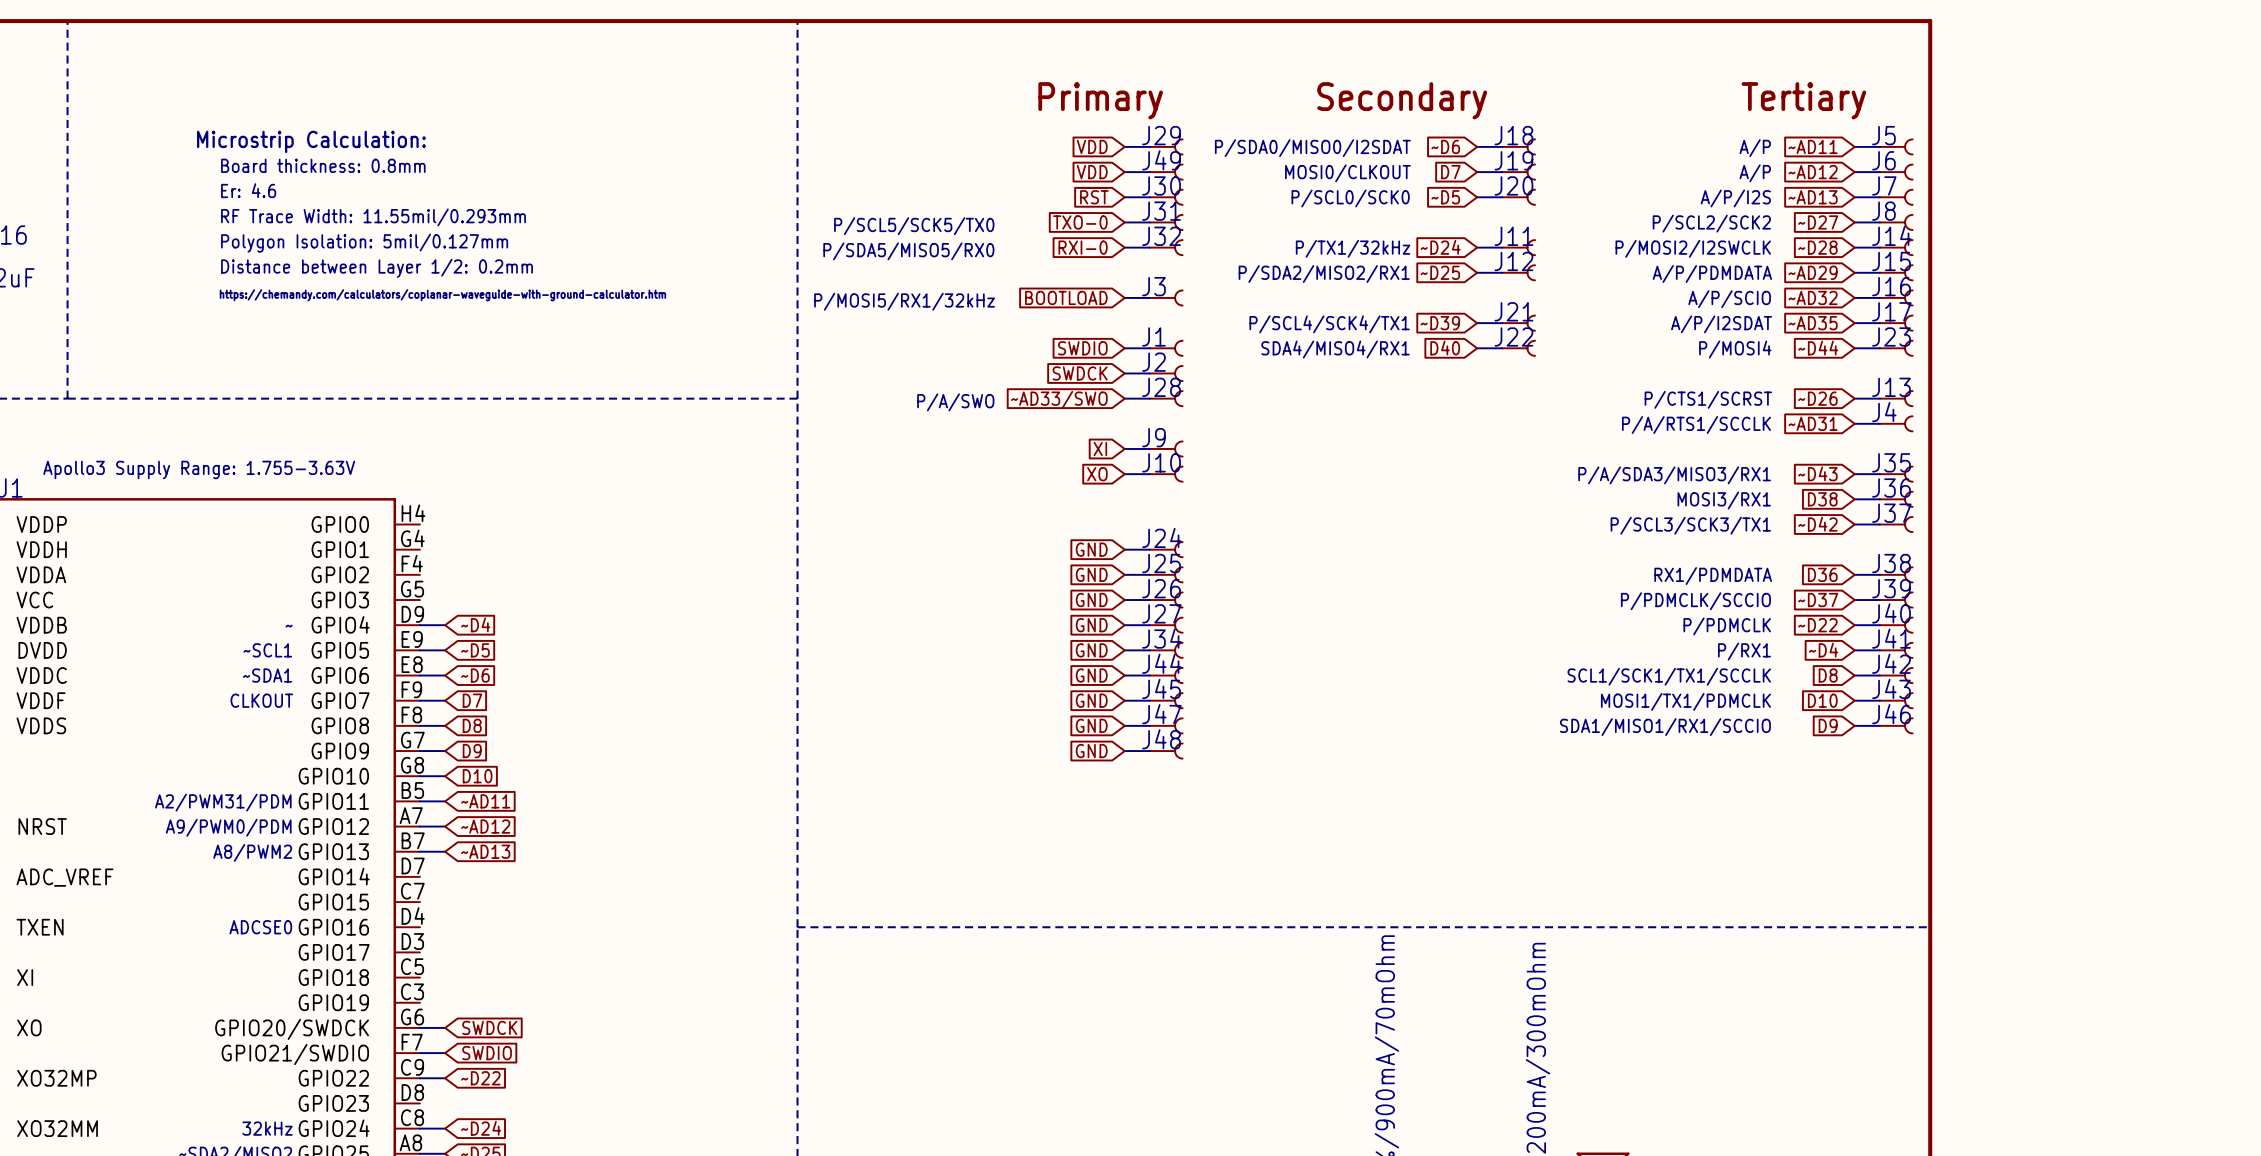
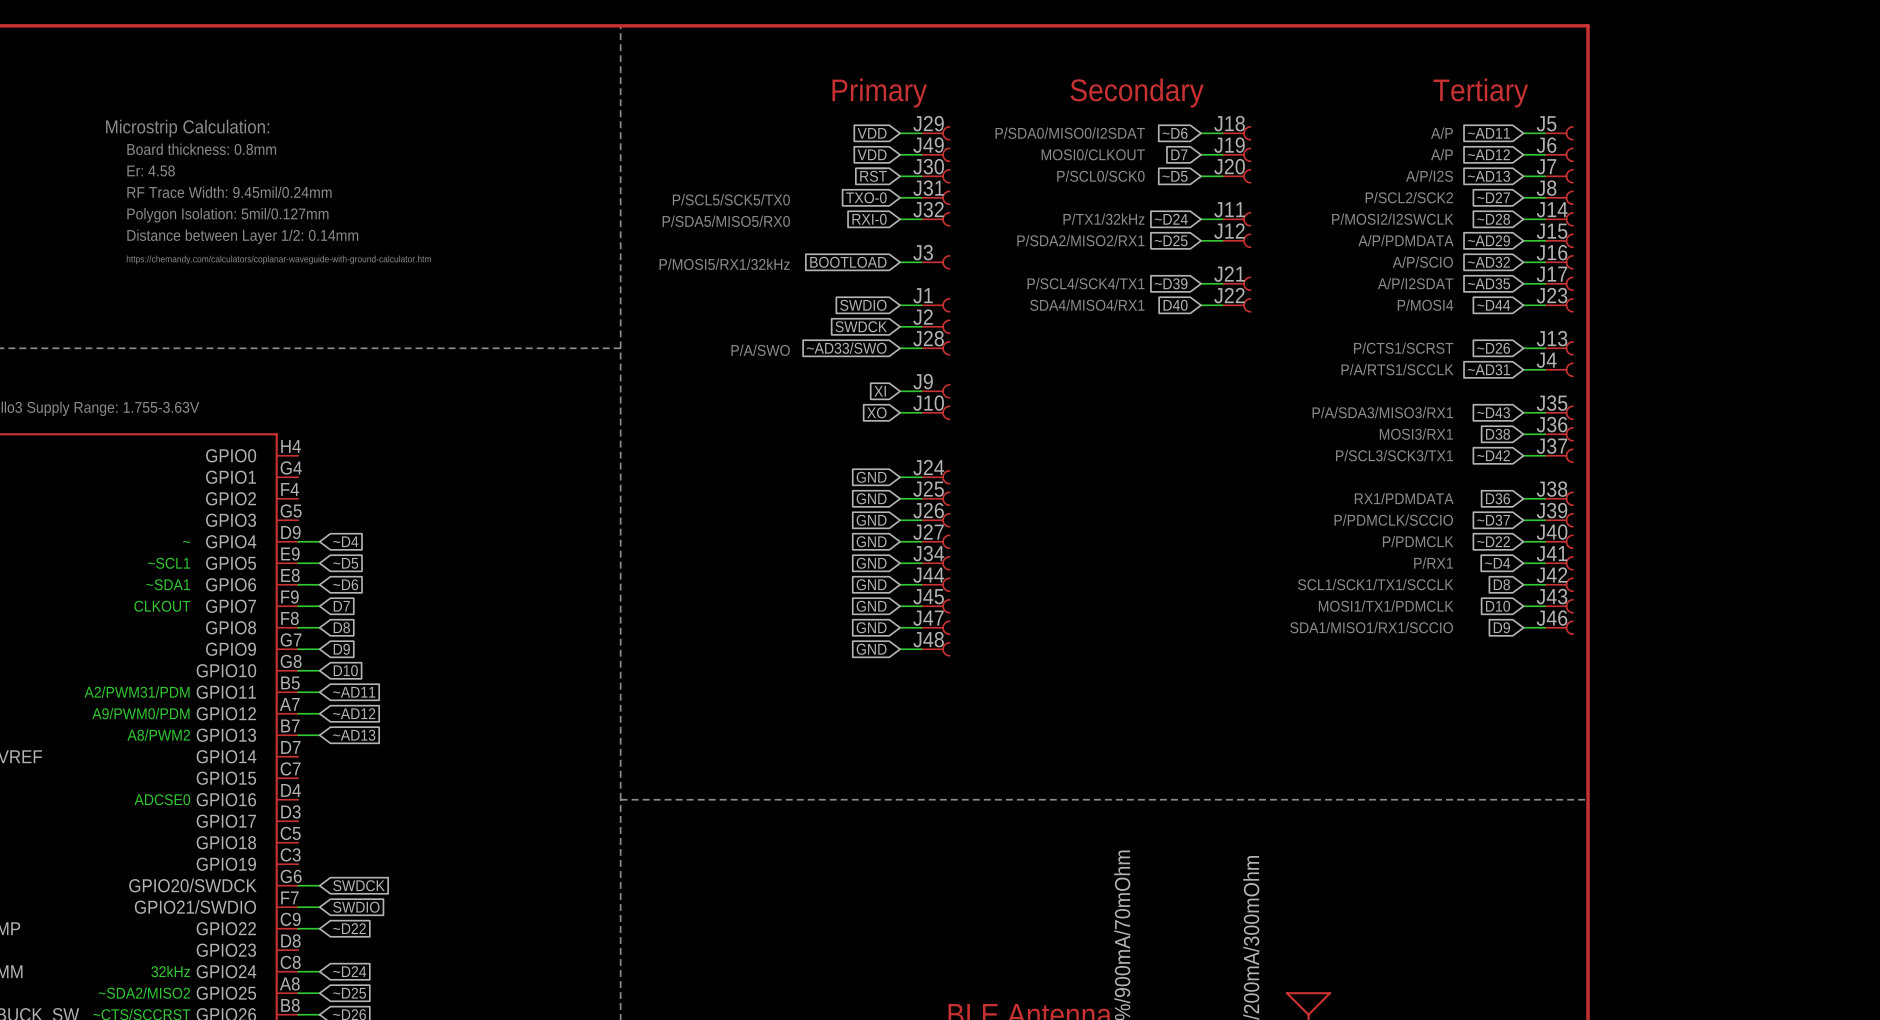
text: Er: 4.6 (248, 190) -> Er: 4.58 (151, 170)
text: RF Trace Width: 11.55mil/0.293mm (373, 217) -> RF Trace Width: 9.45mil/0.24mm (229, 192)
text: Distance between Layer 1/2: 0.2mm (377, 268) -> Distance between Layer 1/2: 0.14mm (242, 236)

